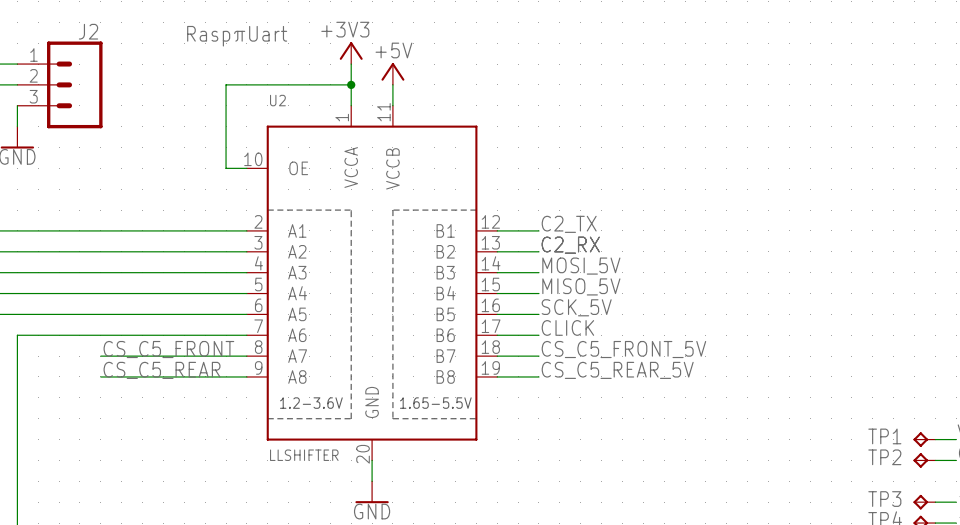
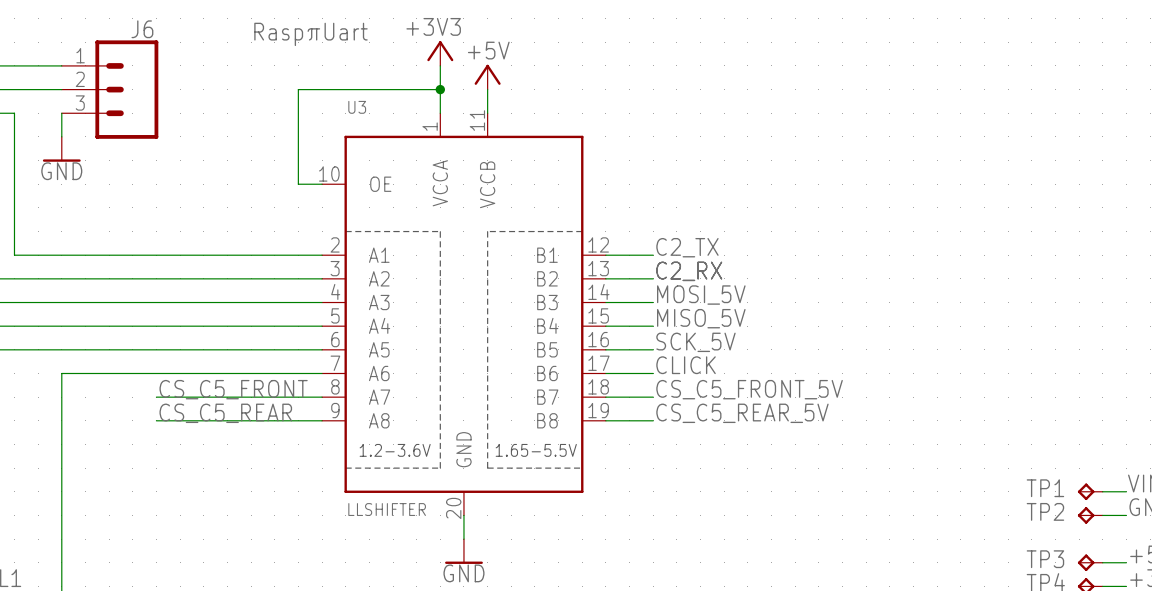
J2 name: J2 (88, 31) -> J6 (142, 29)
U2 name: U2 (277, 100) -> U3 (357, 107)

